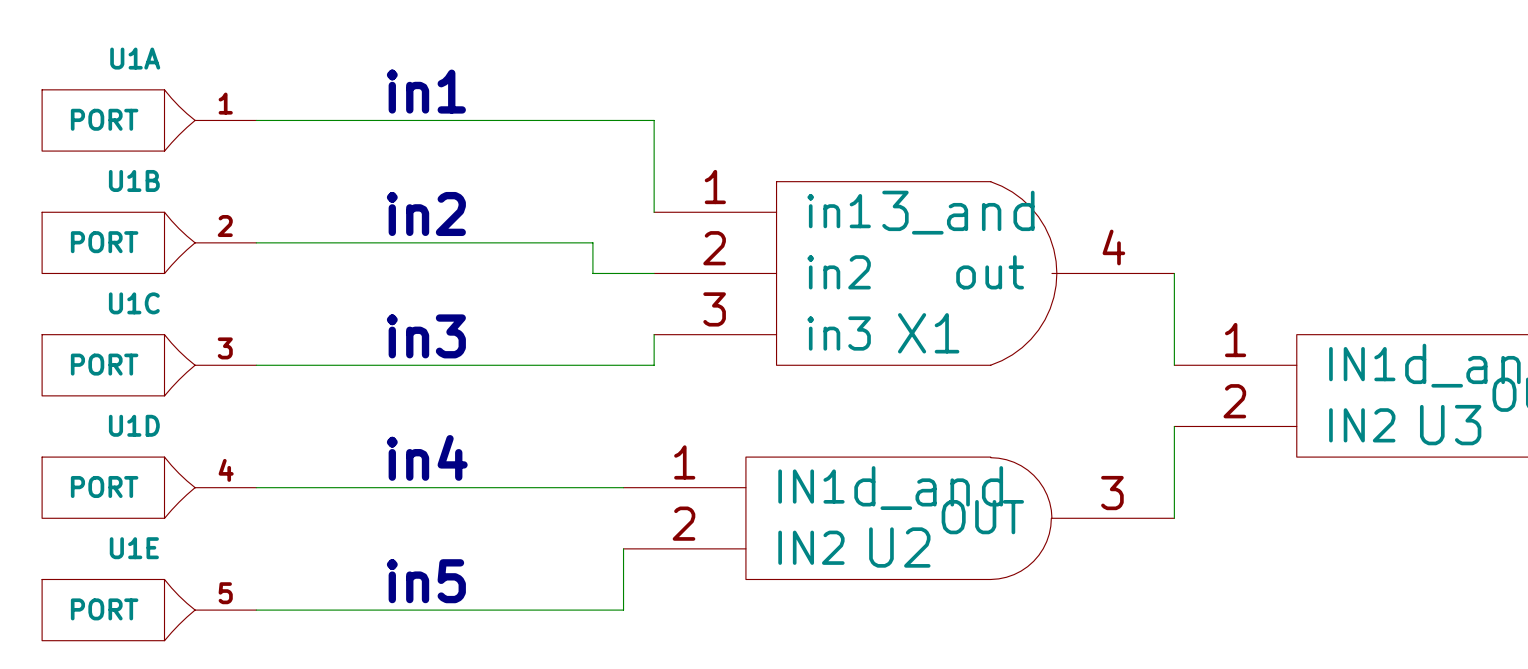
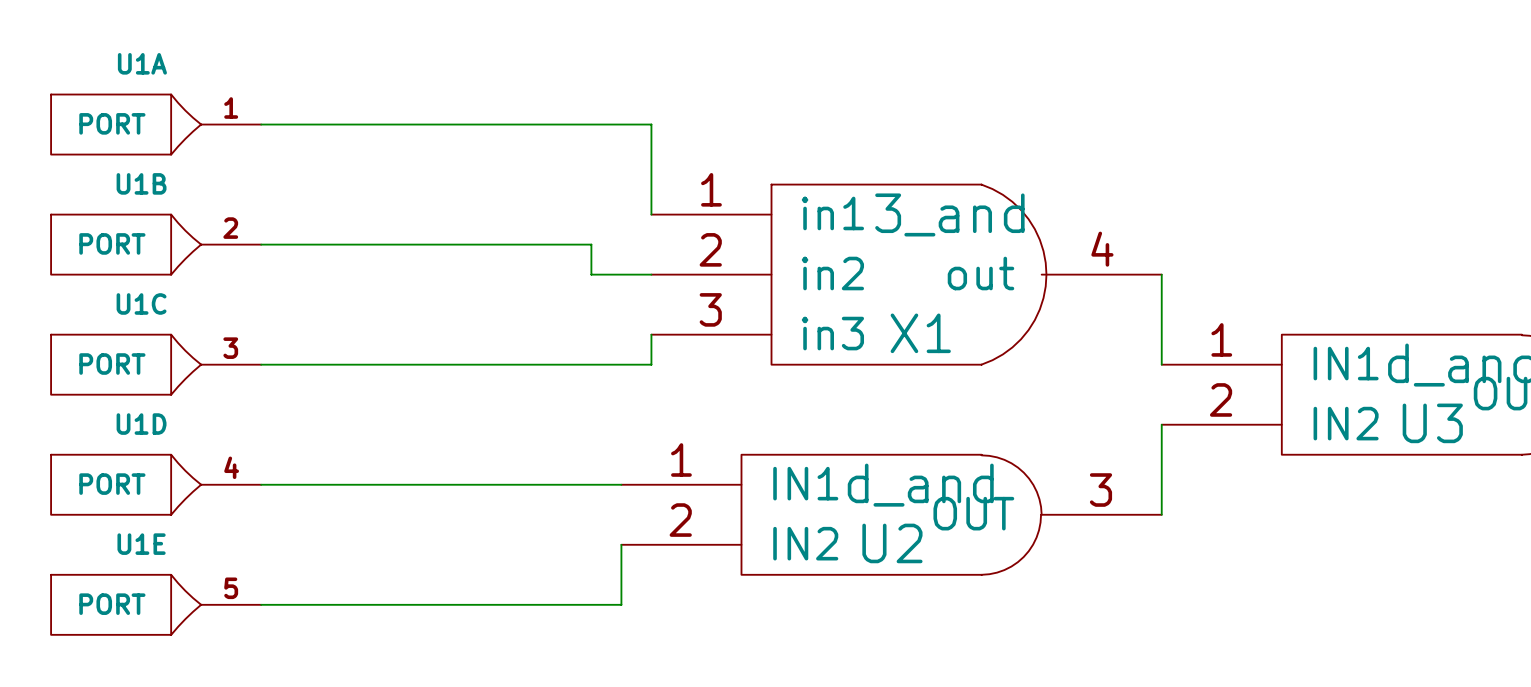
text: in1 (426, 91) -> none
text: in2 (426, 213) -> none
text: in3 (426, 336) -> none
text: in4 (427, 457) -> none
text: in5 (426, 581) -> none

